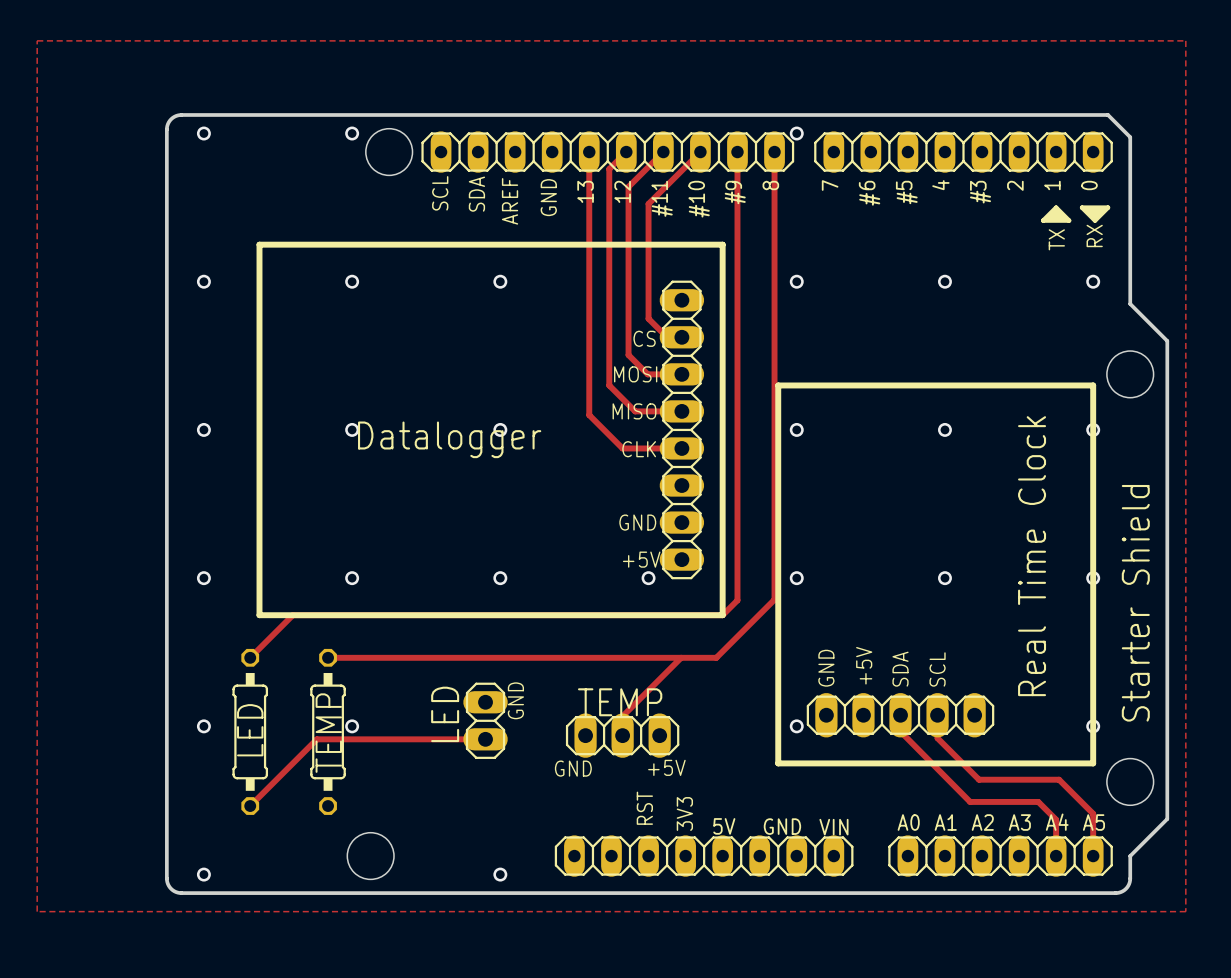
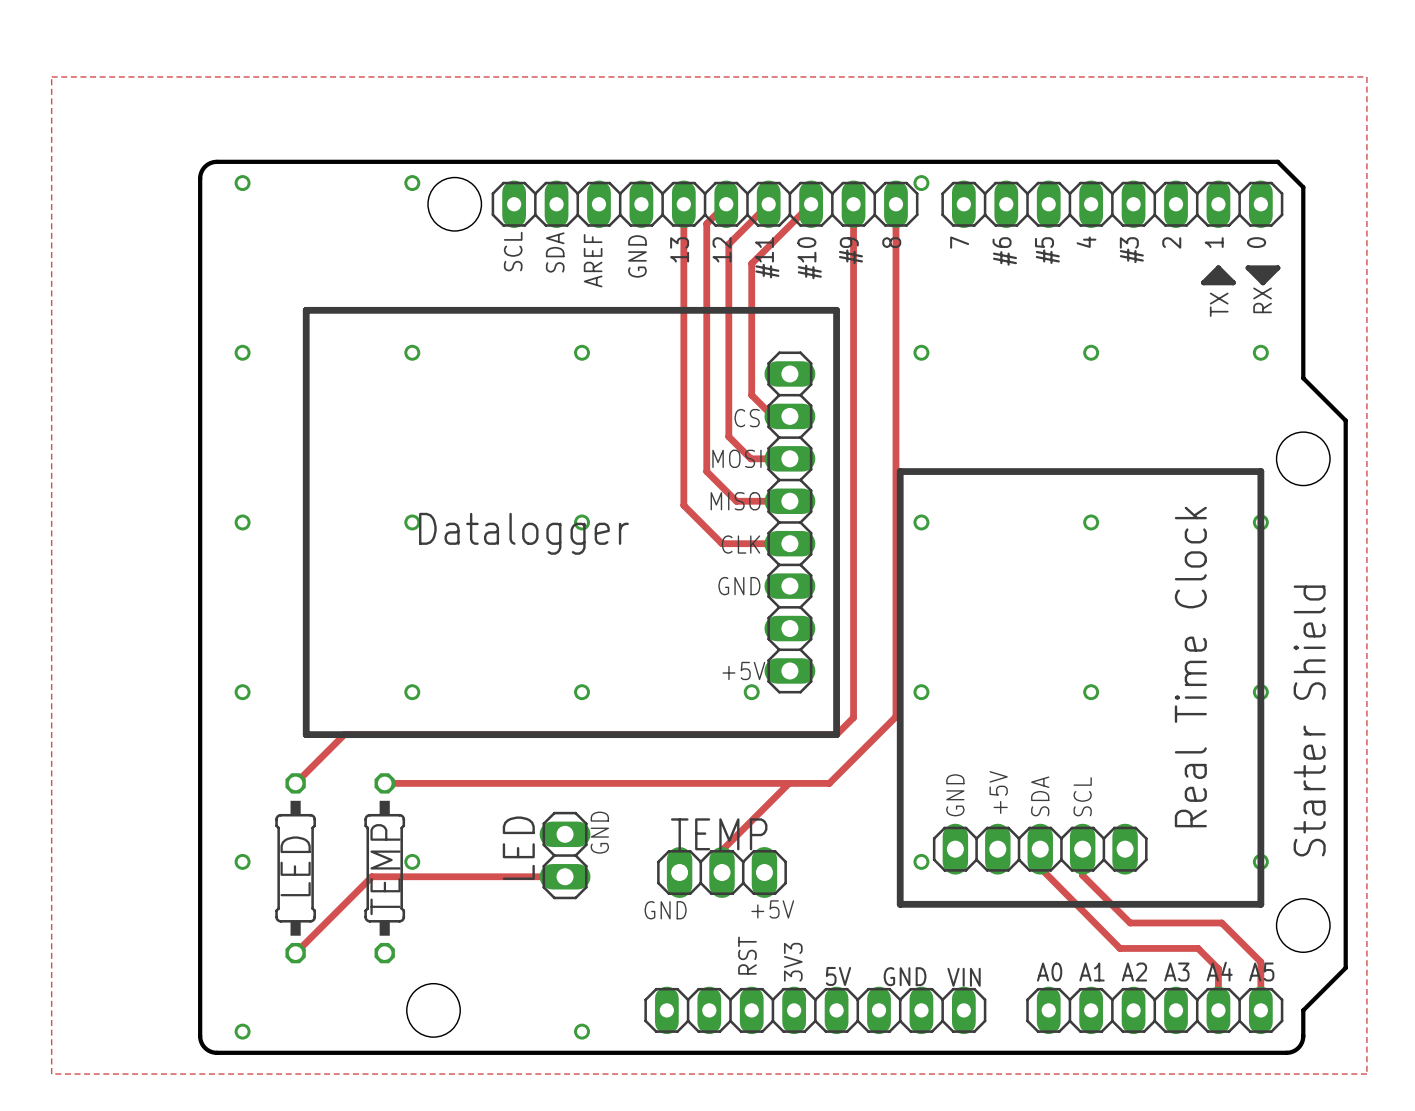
text position: GND (637, 522) -> GND (739, 586)

